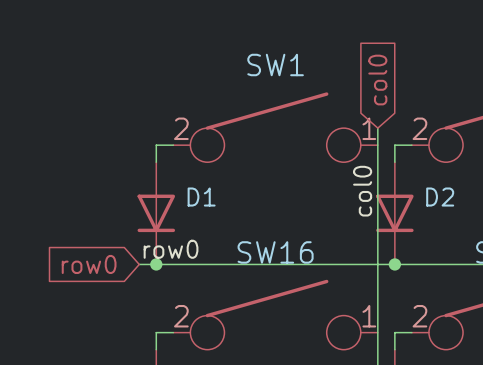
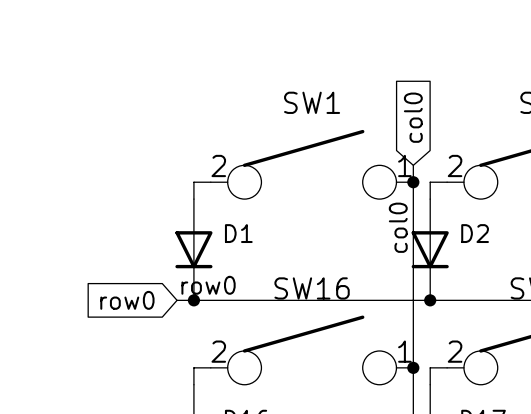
junction: none -> (413, 182)
junction: none -> (413, 367)

